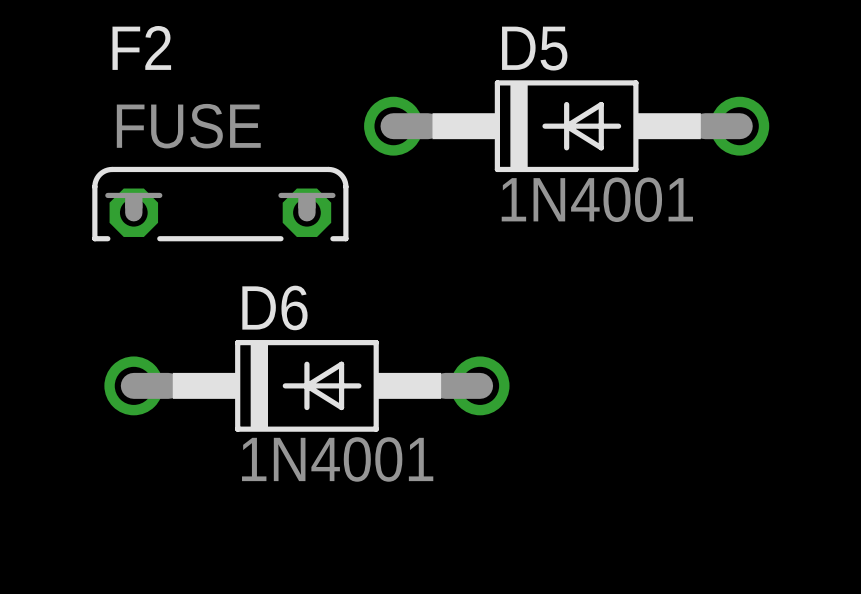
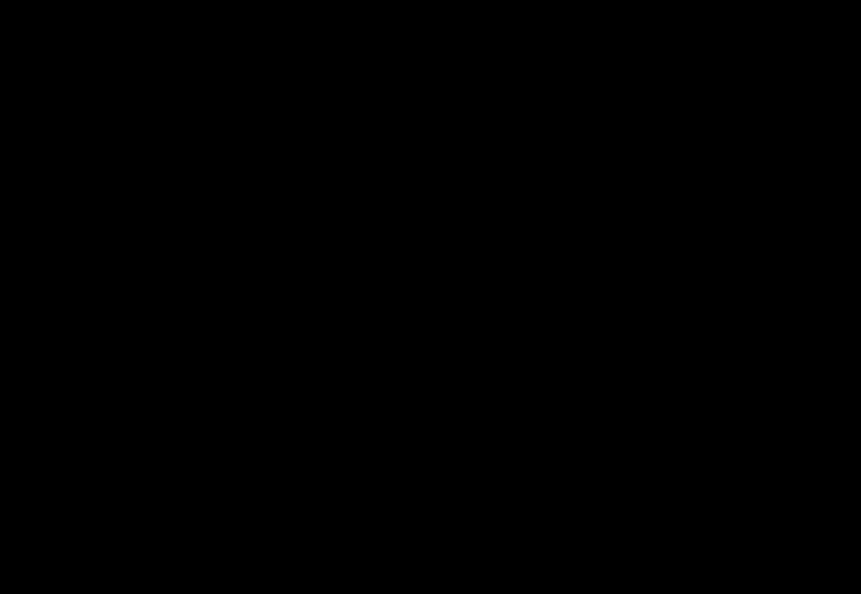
D5: 1N4001 (566, 126) -> none
F2: FUSE (220, 204) -> none
D6: 1N4001 (306, 385) -> none

